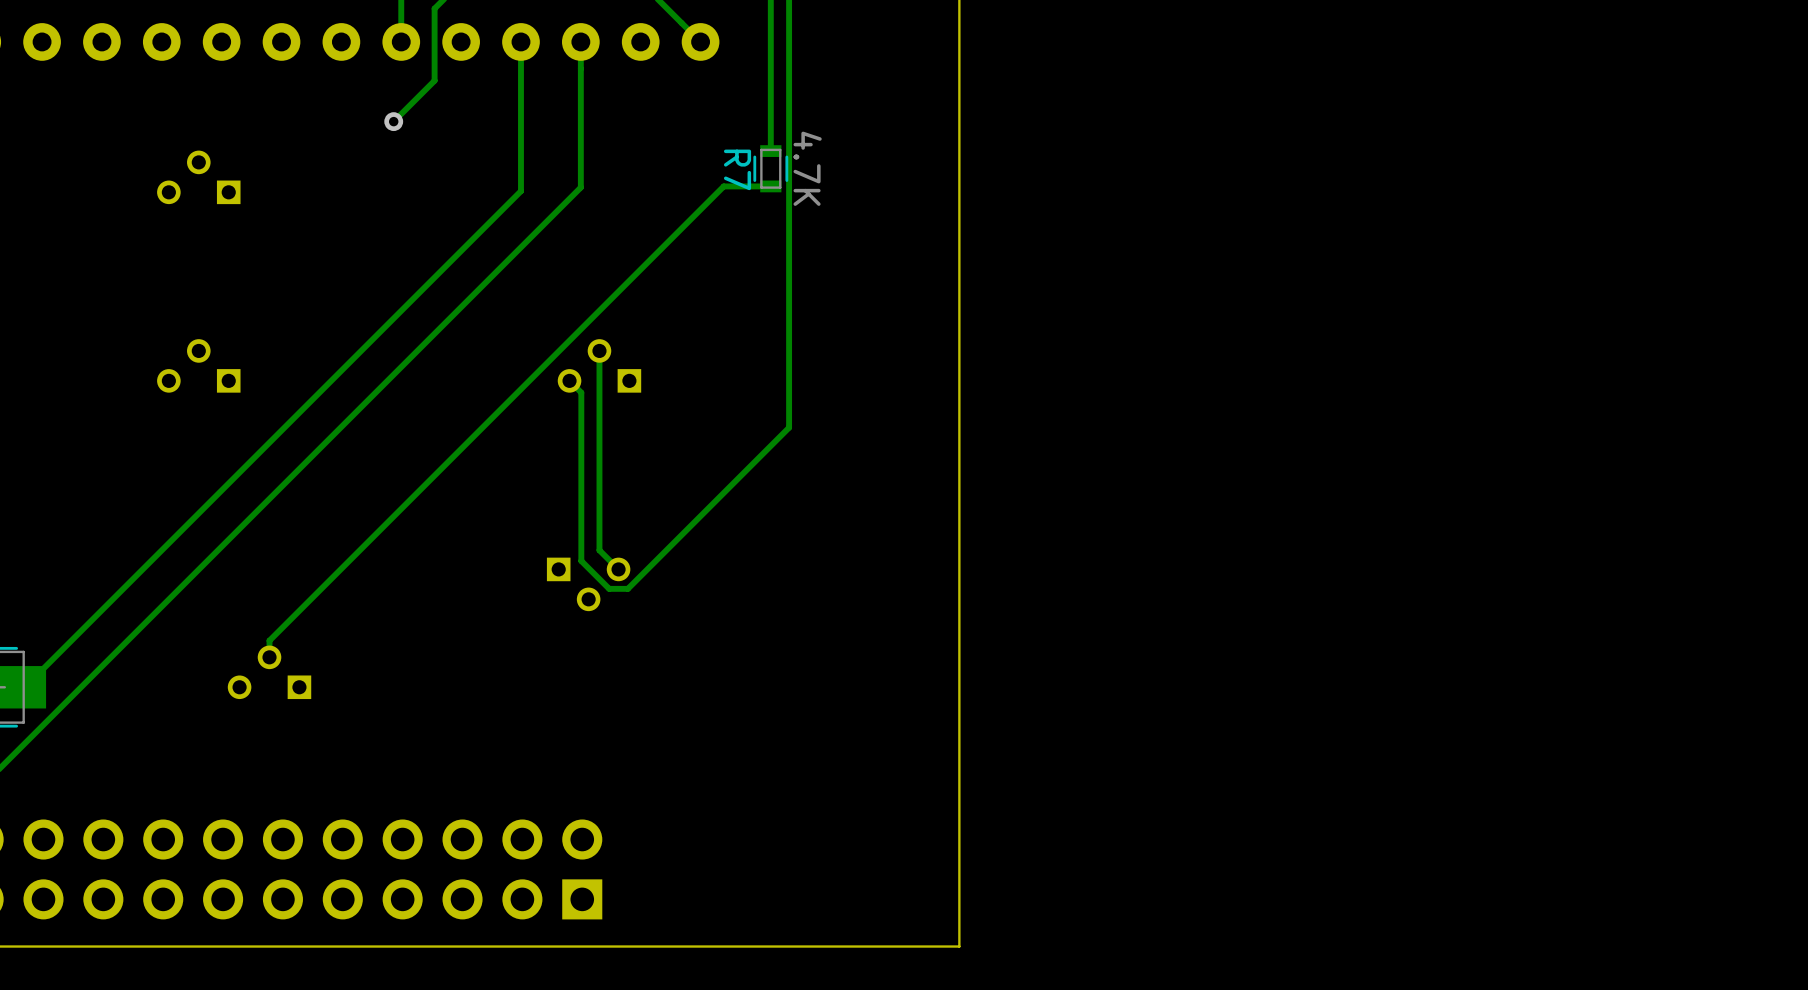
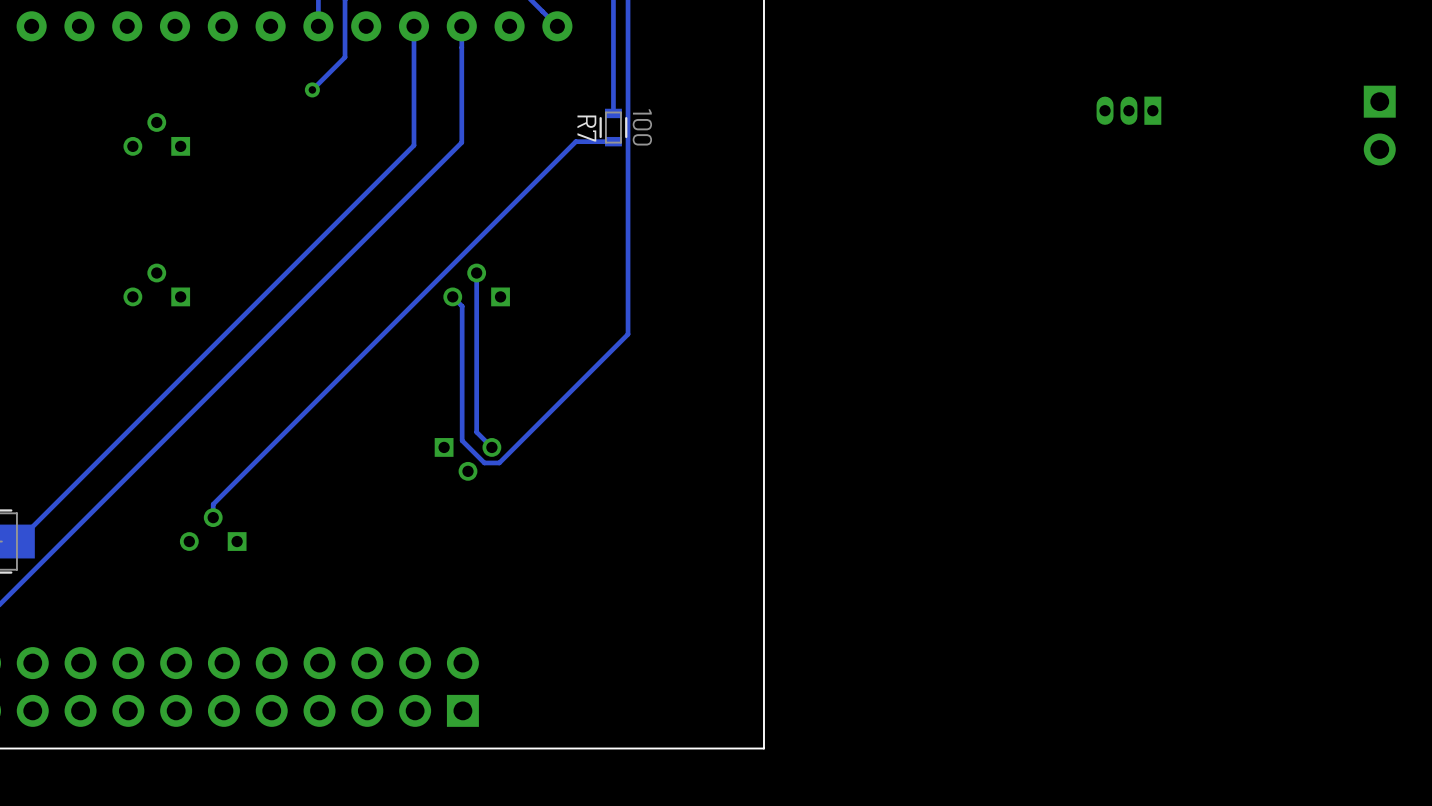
part: none -> (1128, 110)
part: none -> (1379, 125)
R7 value: 4.7K (807, 168) -> 100 (642, 127)

